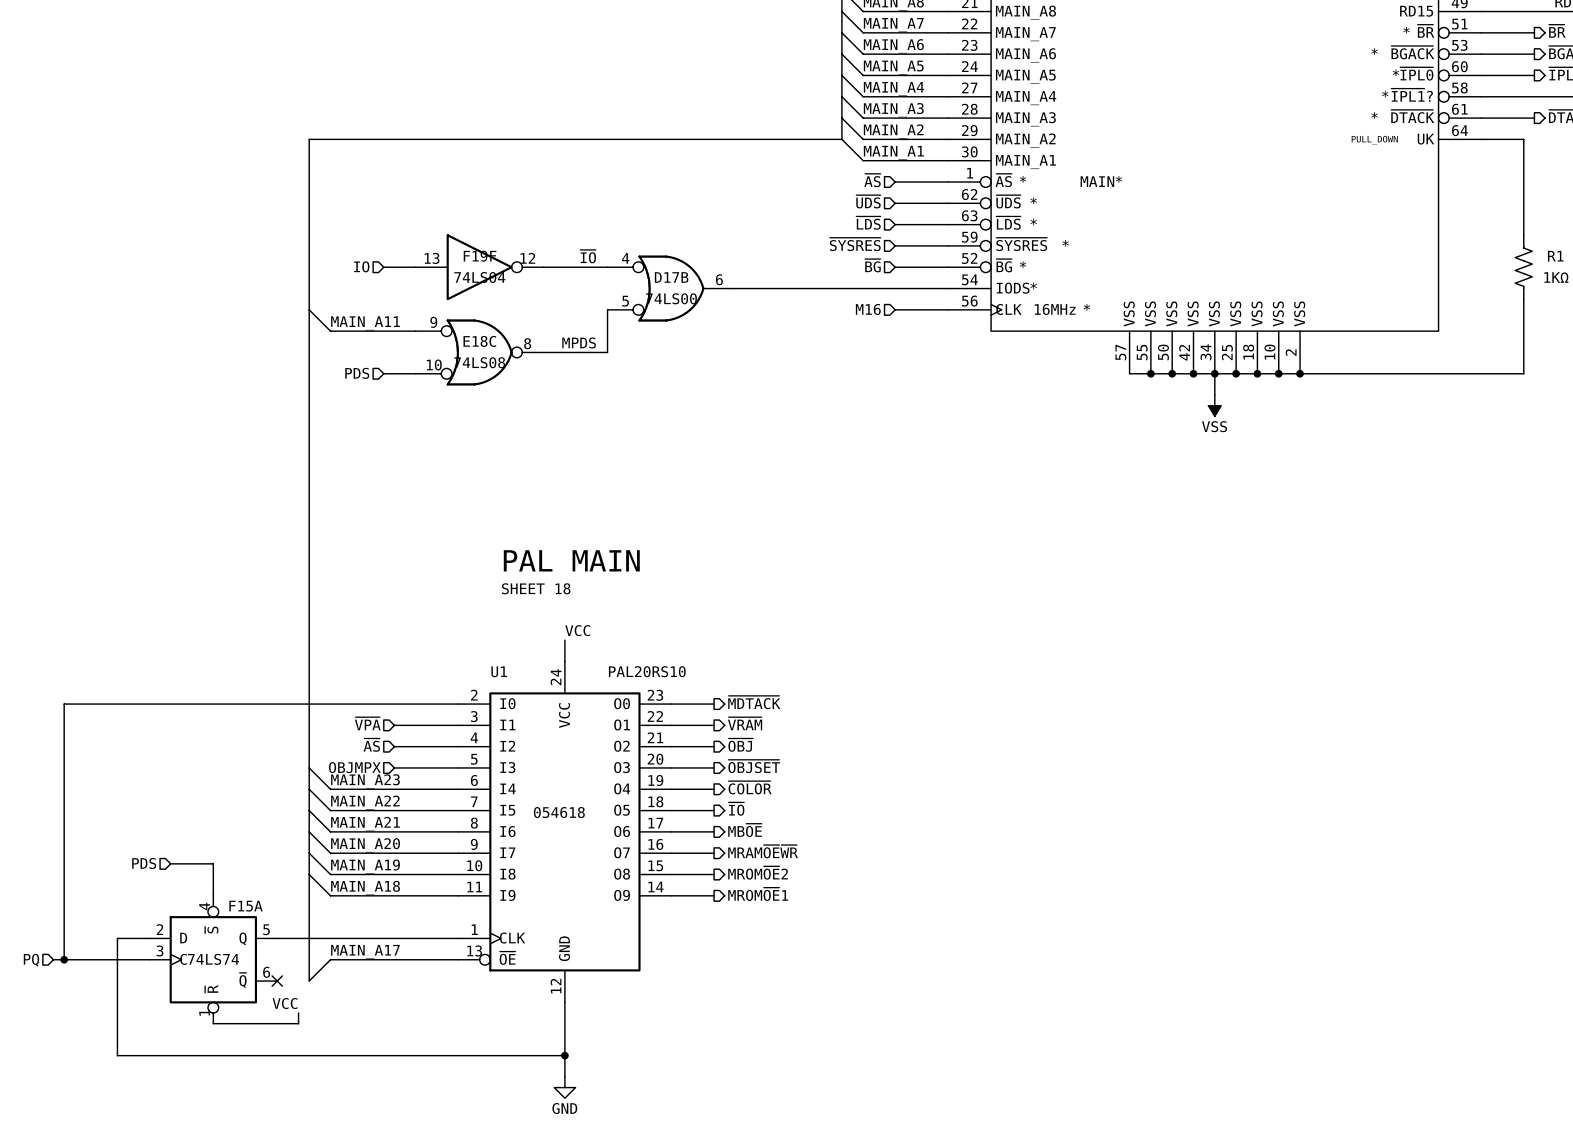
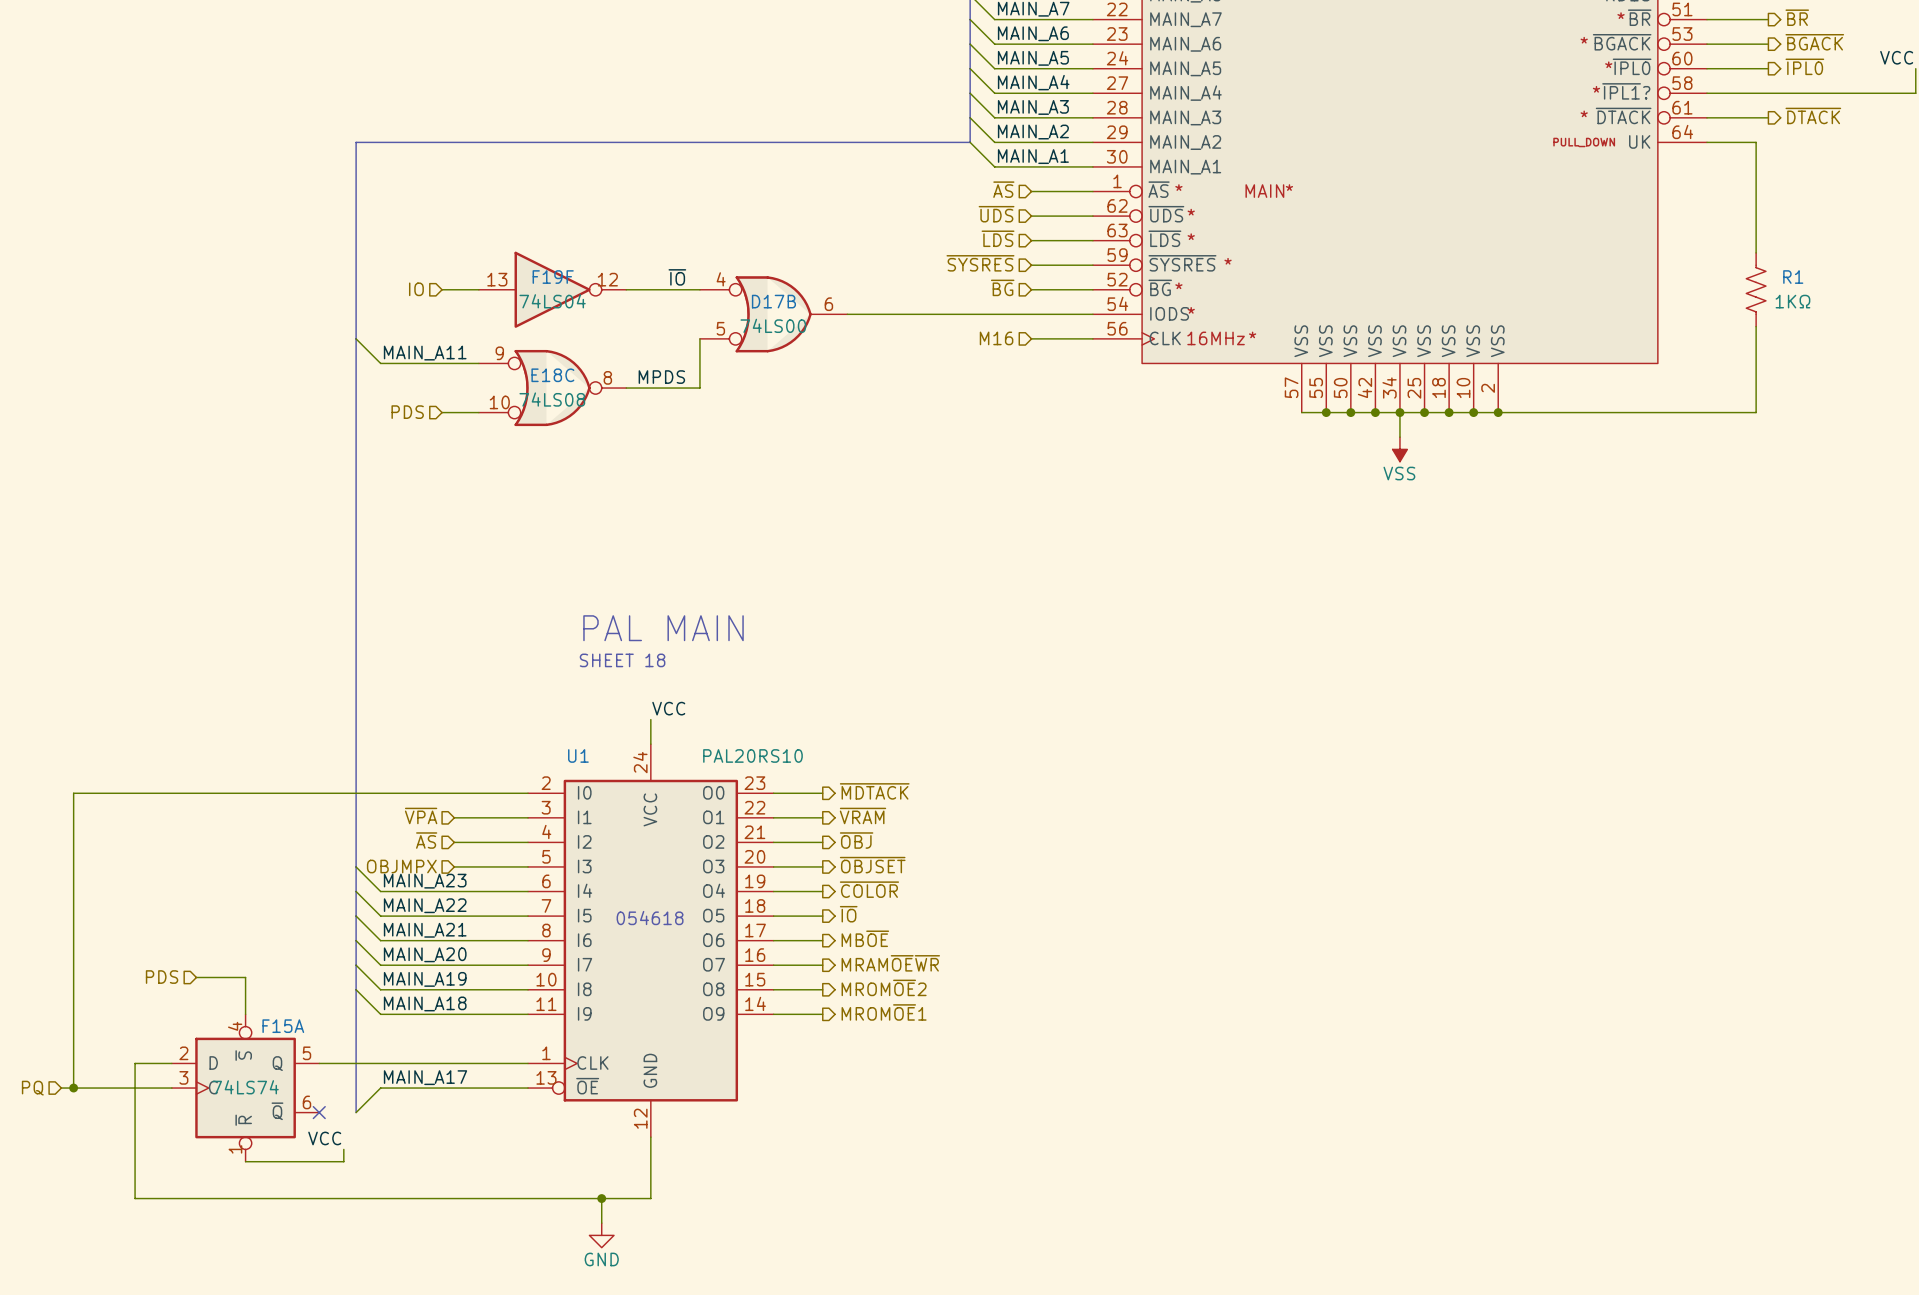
wire: (564, 1055) (564, 1076) -> (601, 1198) (601, 1223)
junction position: (564, 1055) -> (601, 1198)
power symbol position: GND (564, 1087) -> GND (601, 1235)

